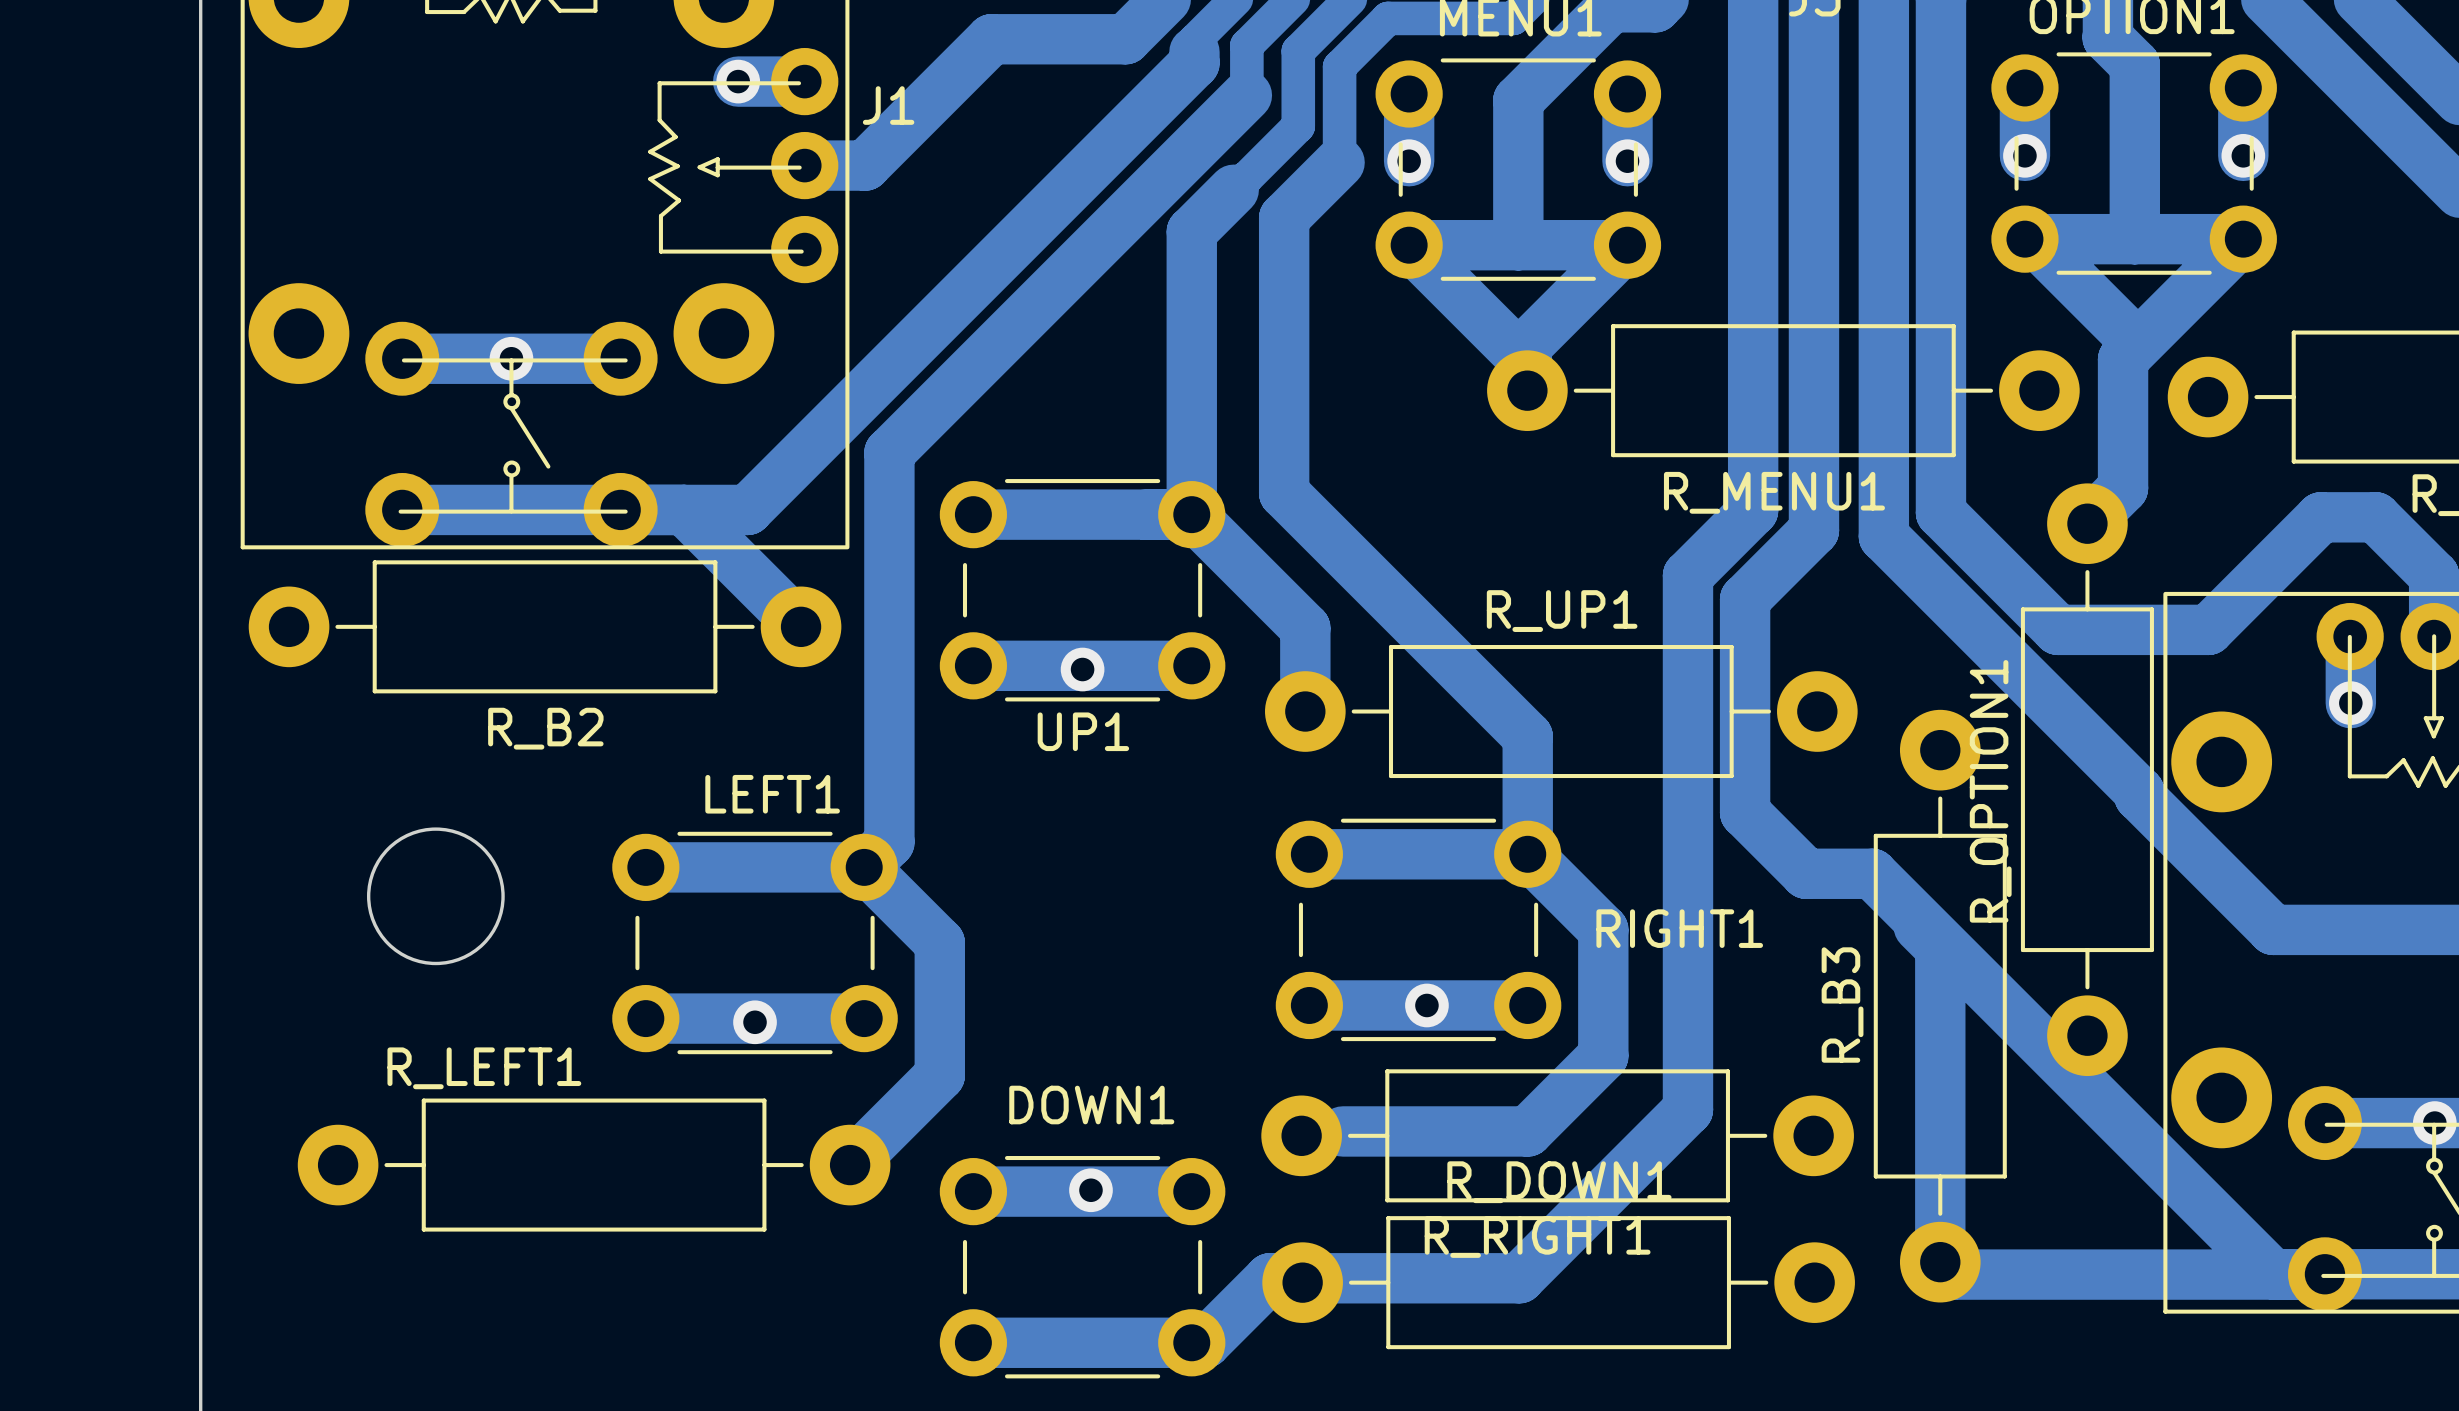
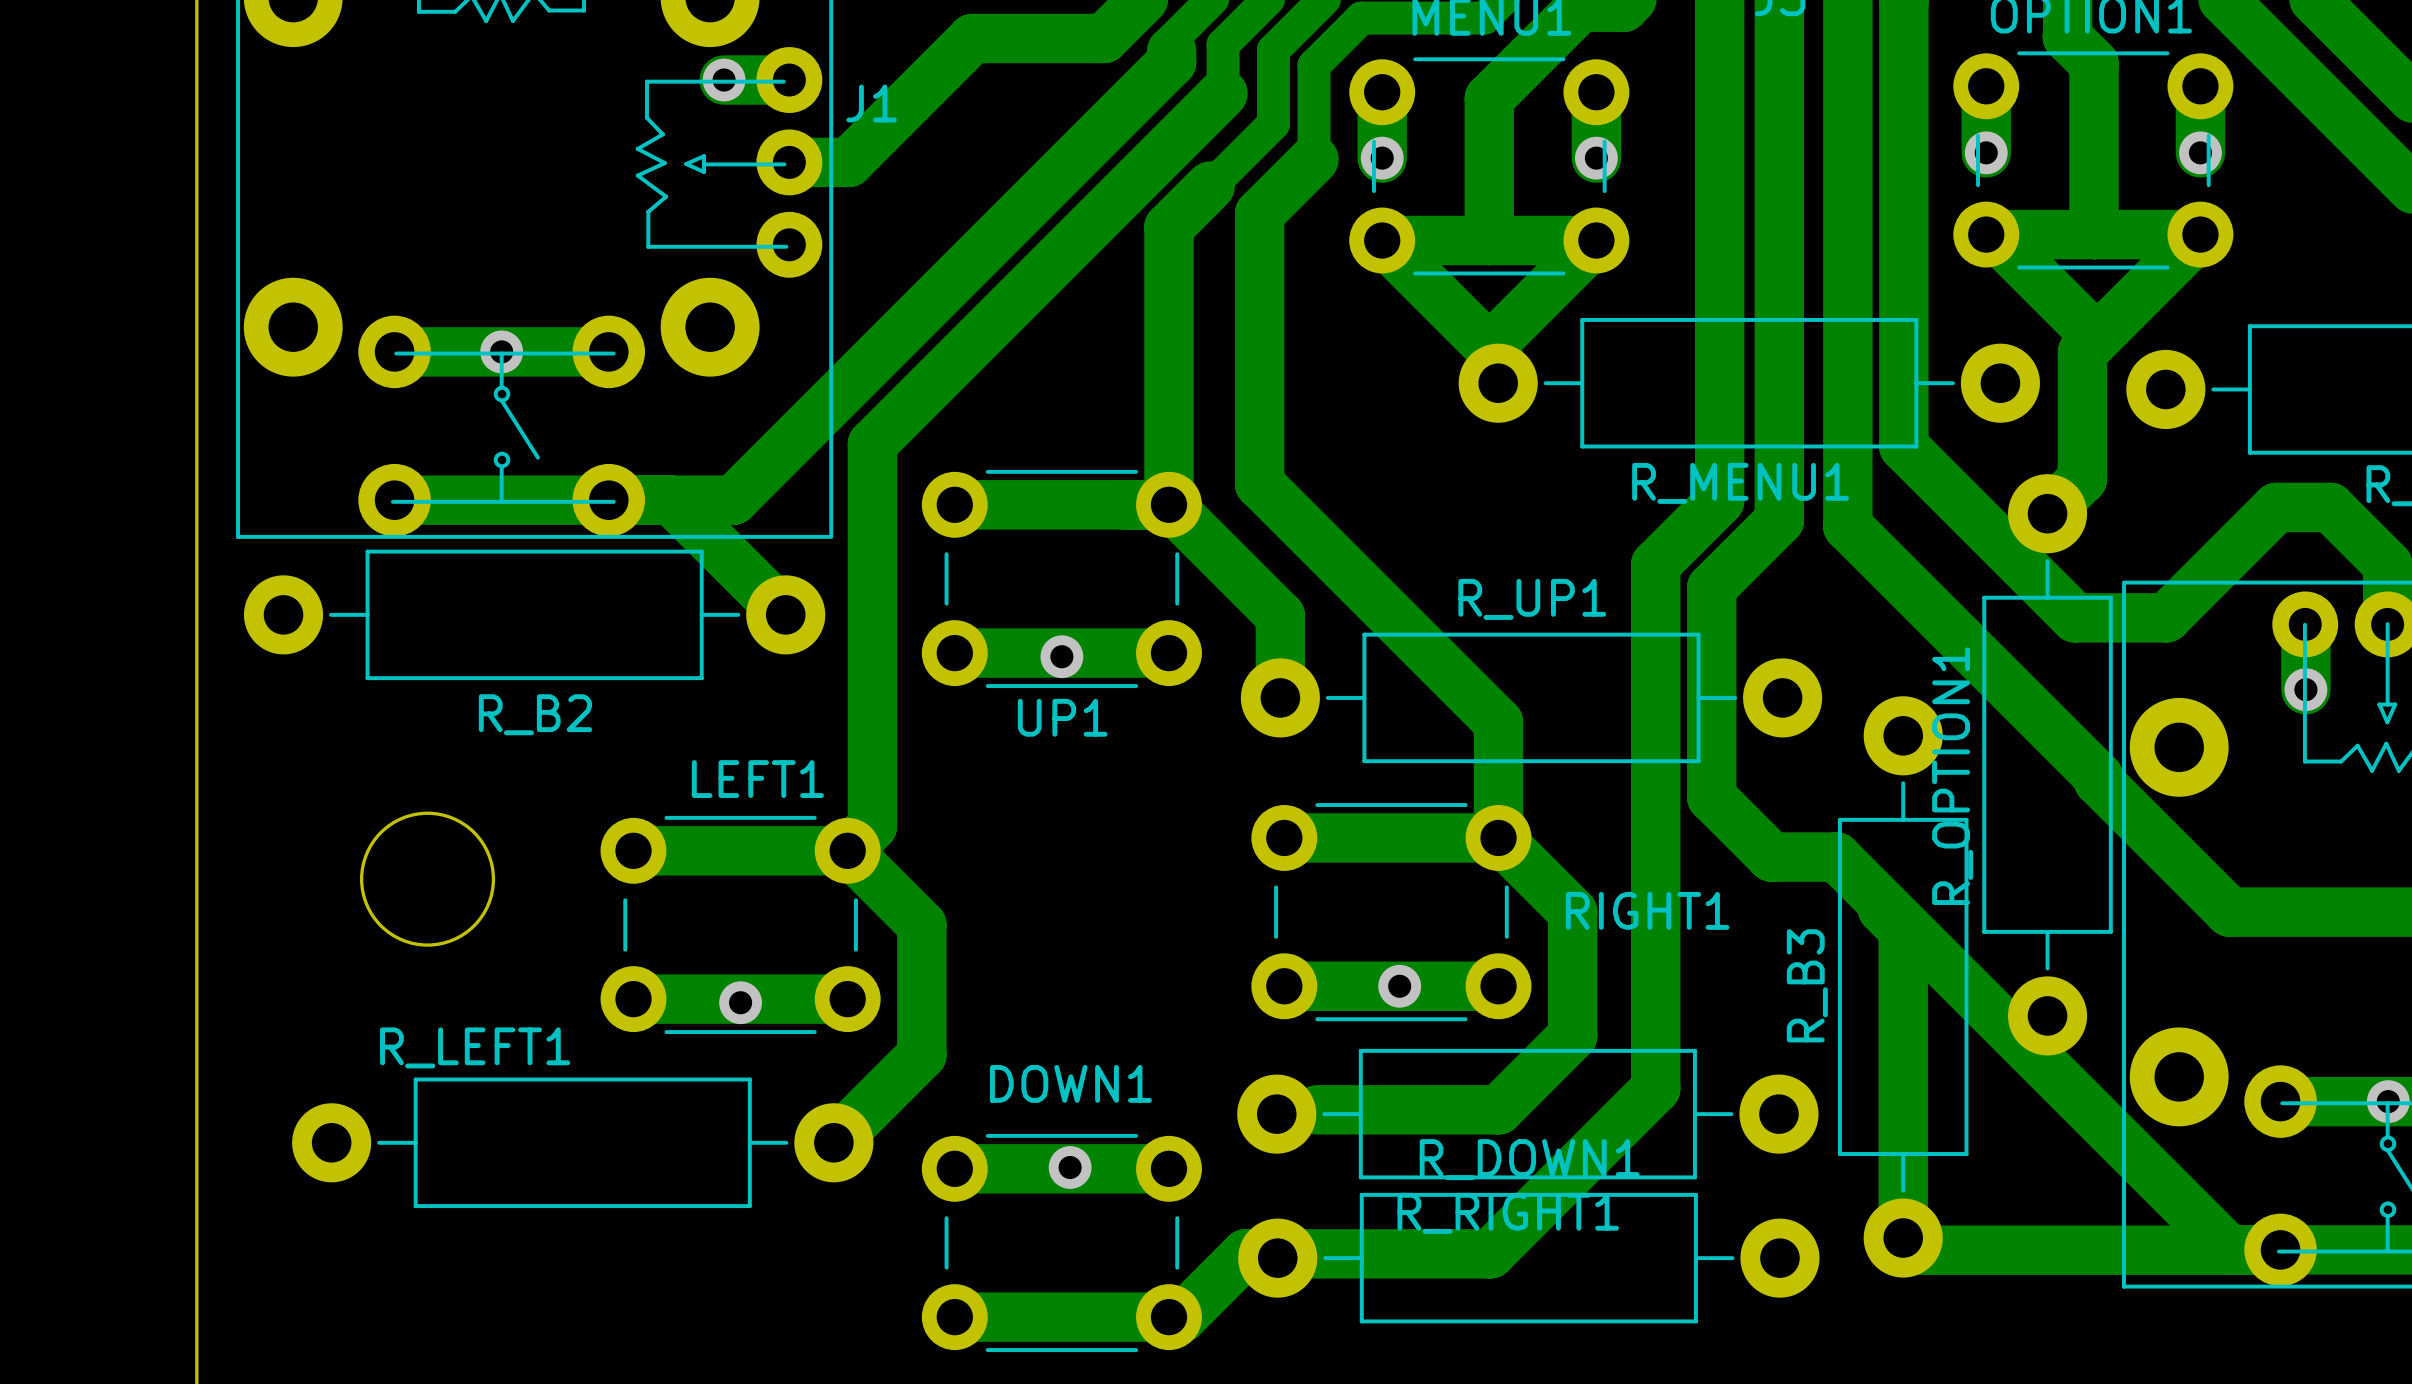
bottom track: (1940, 455) (1940, 512) (2058, 629) (2115, 629) -> (1903, 446) (2075, 617)

